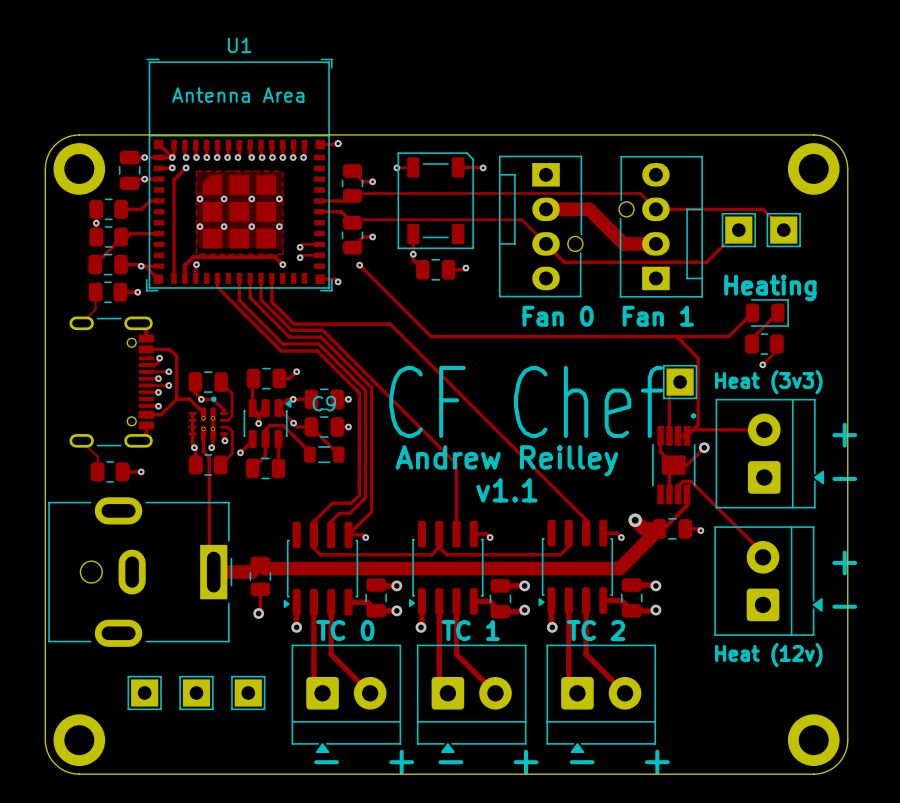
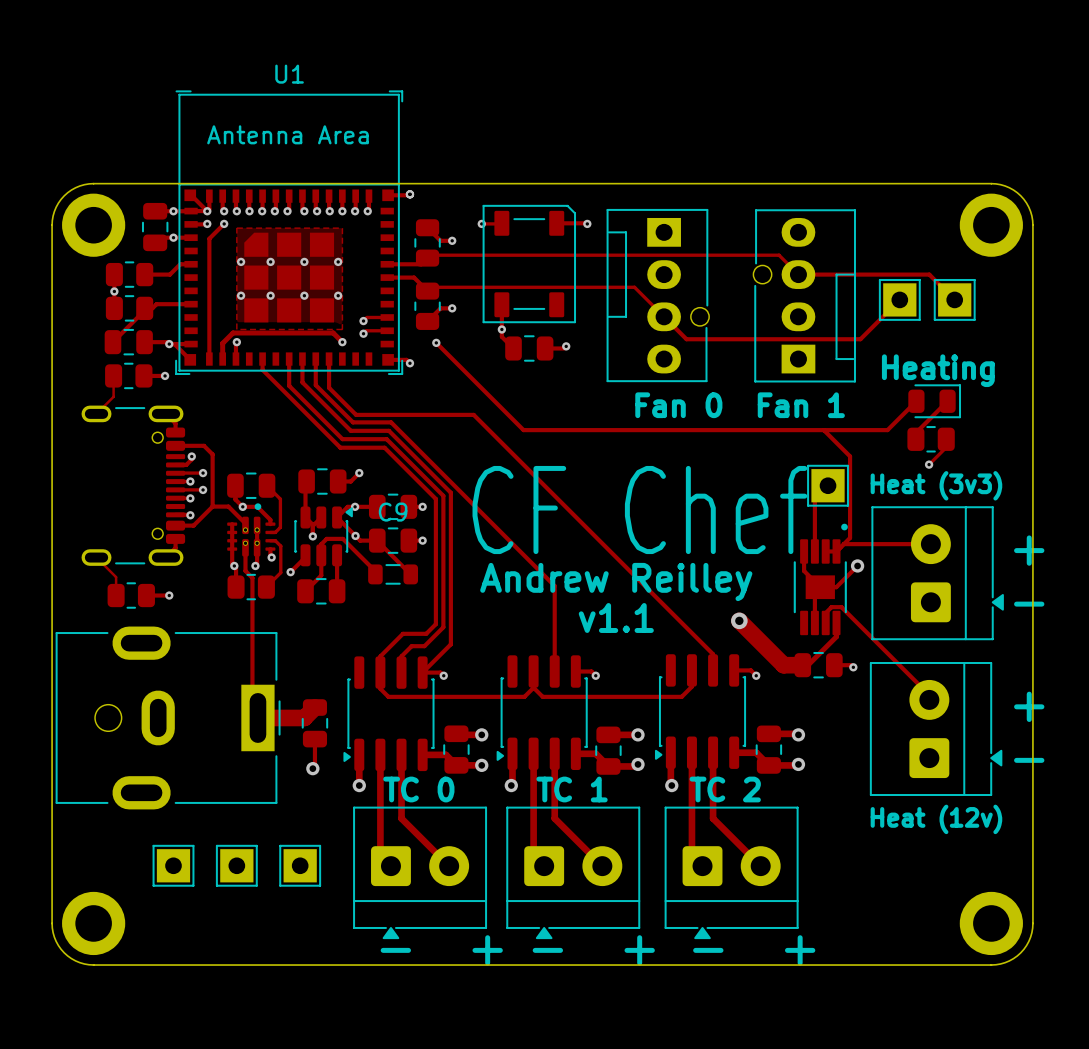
track: (546, 209) (589, 209) (623, 243) (655, 243) -> none
track: none -> (739, 620) (773, 654)
via position: (635, 520) -> (739, 620)
track: (659, 528) (619, 568) (265, 568) (260, 563) -> none

